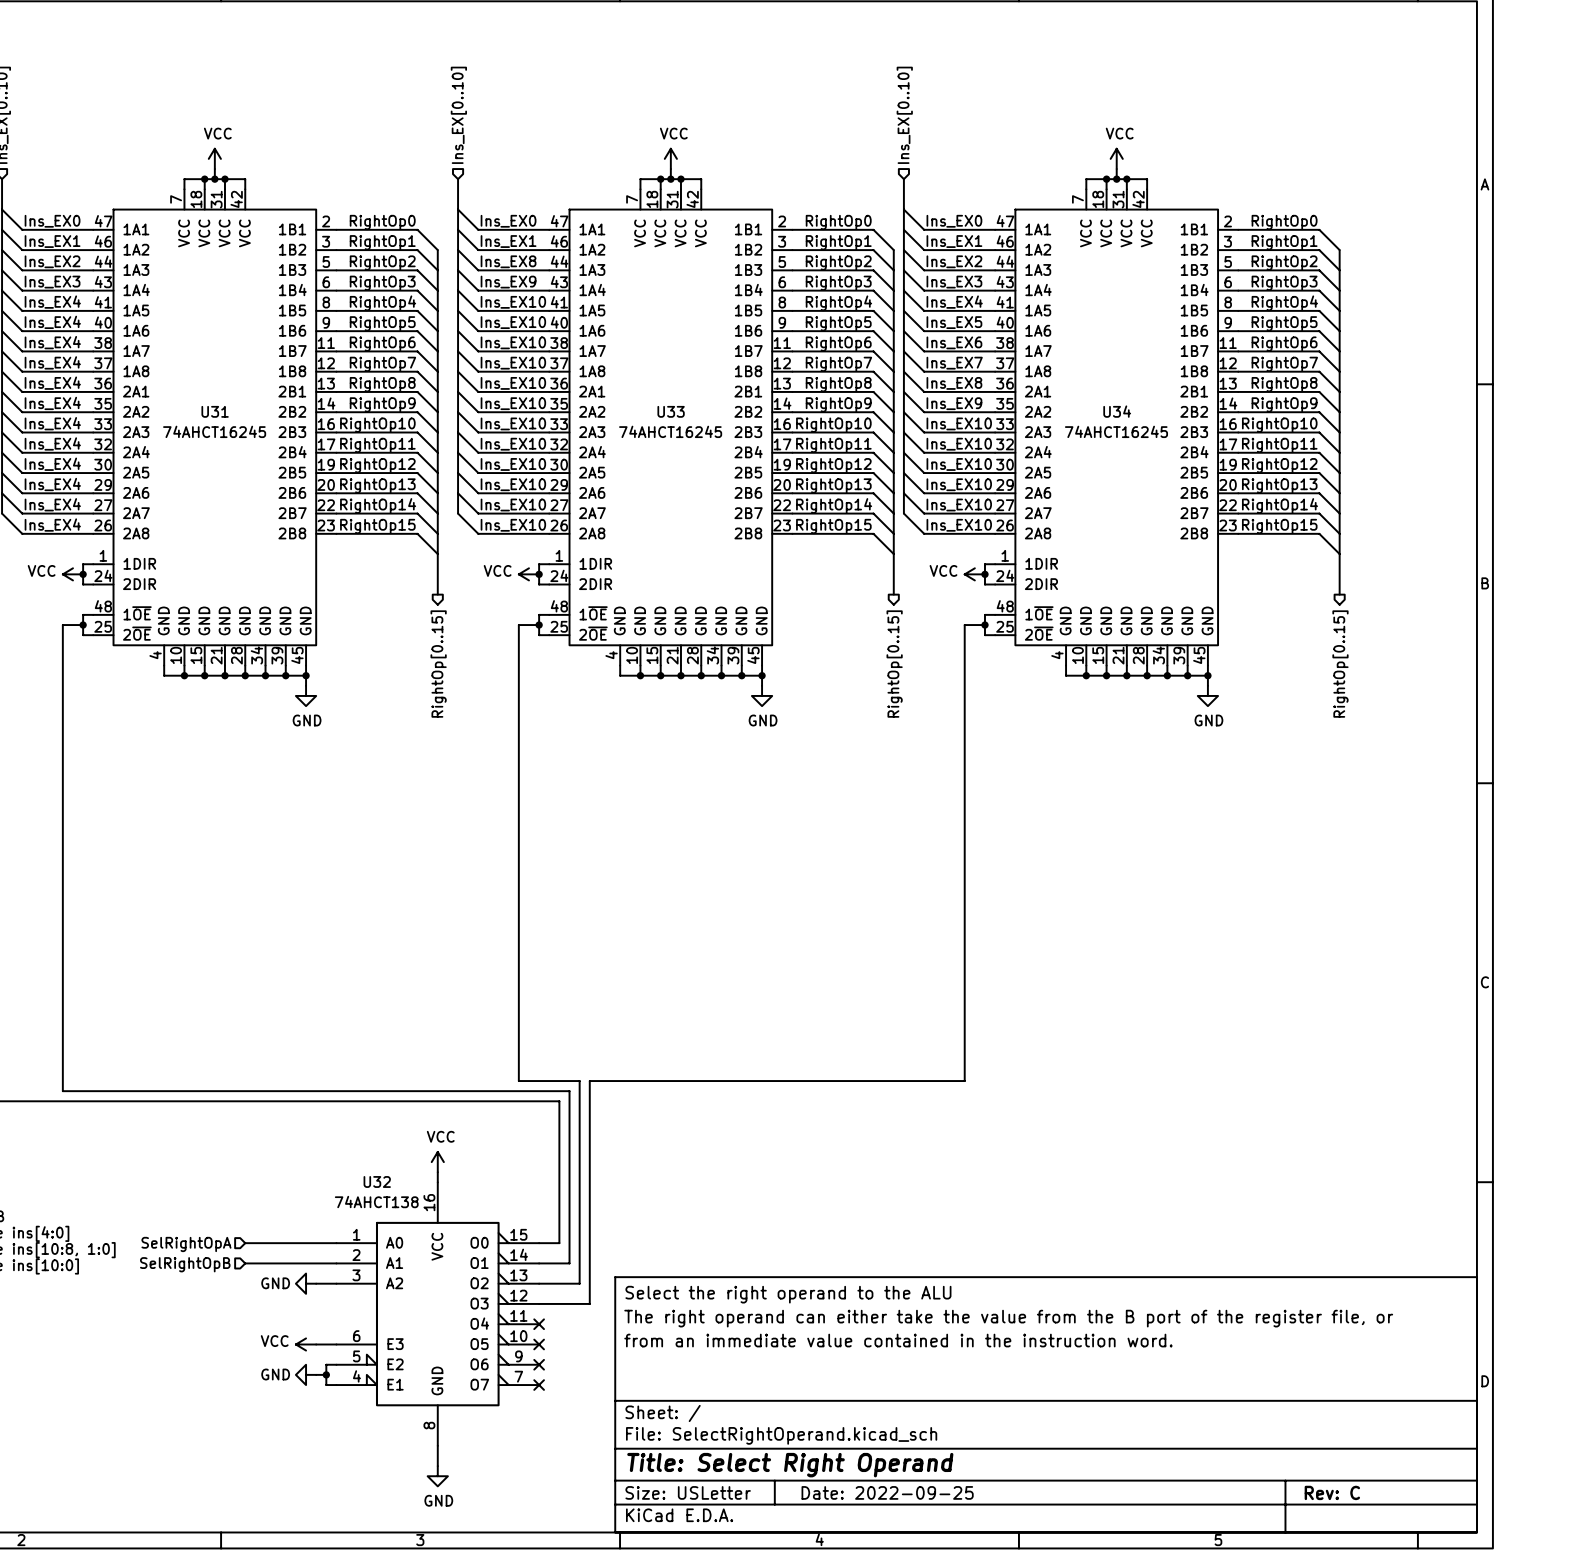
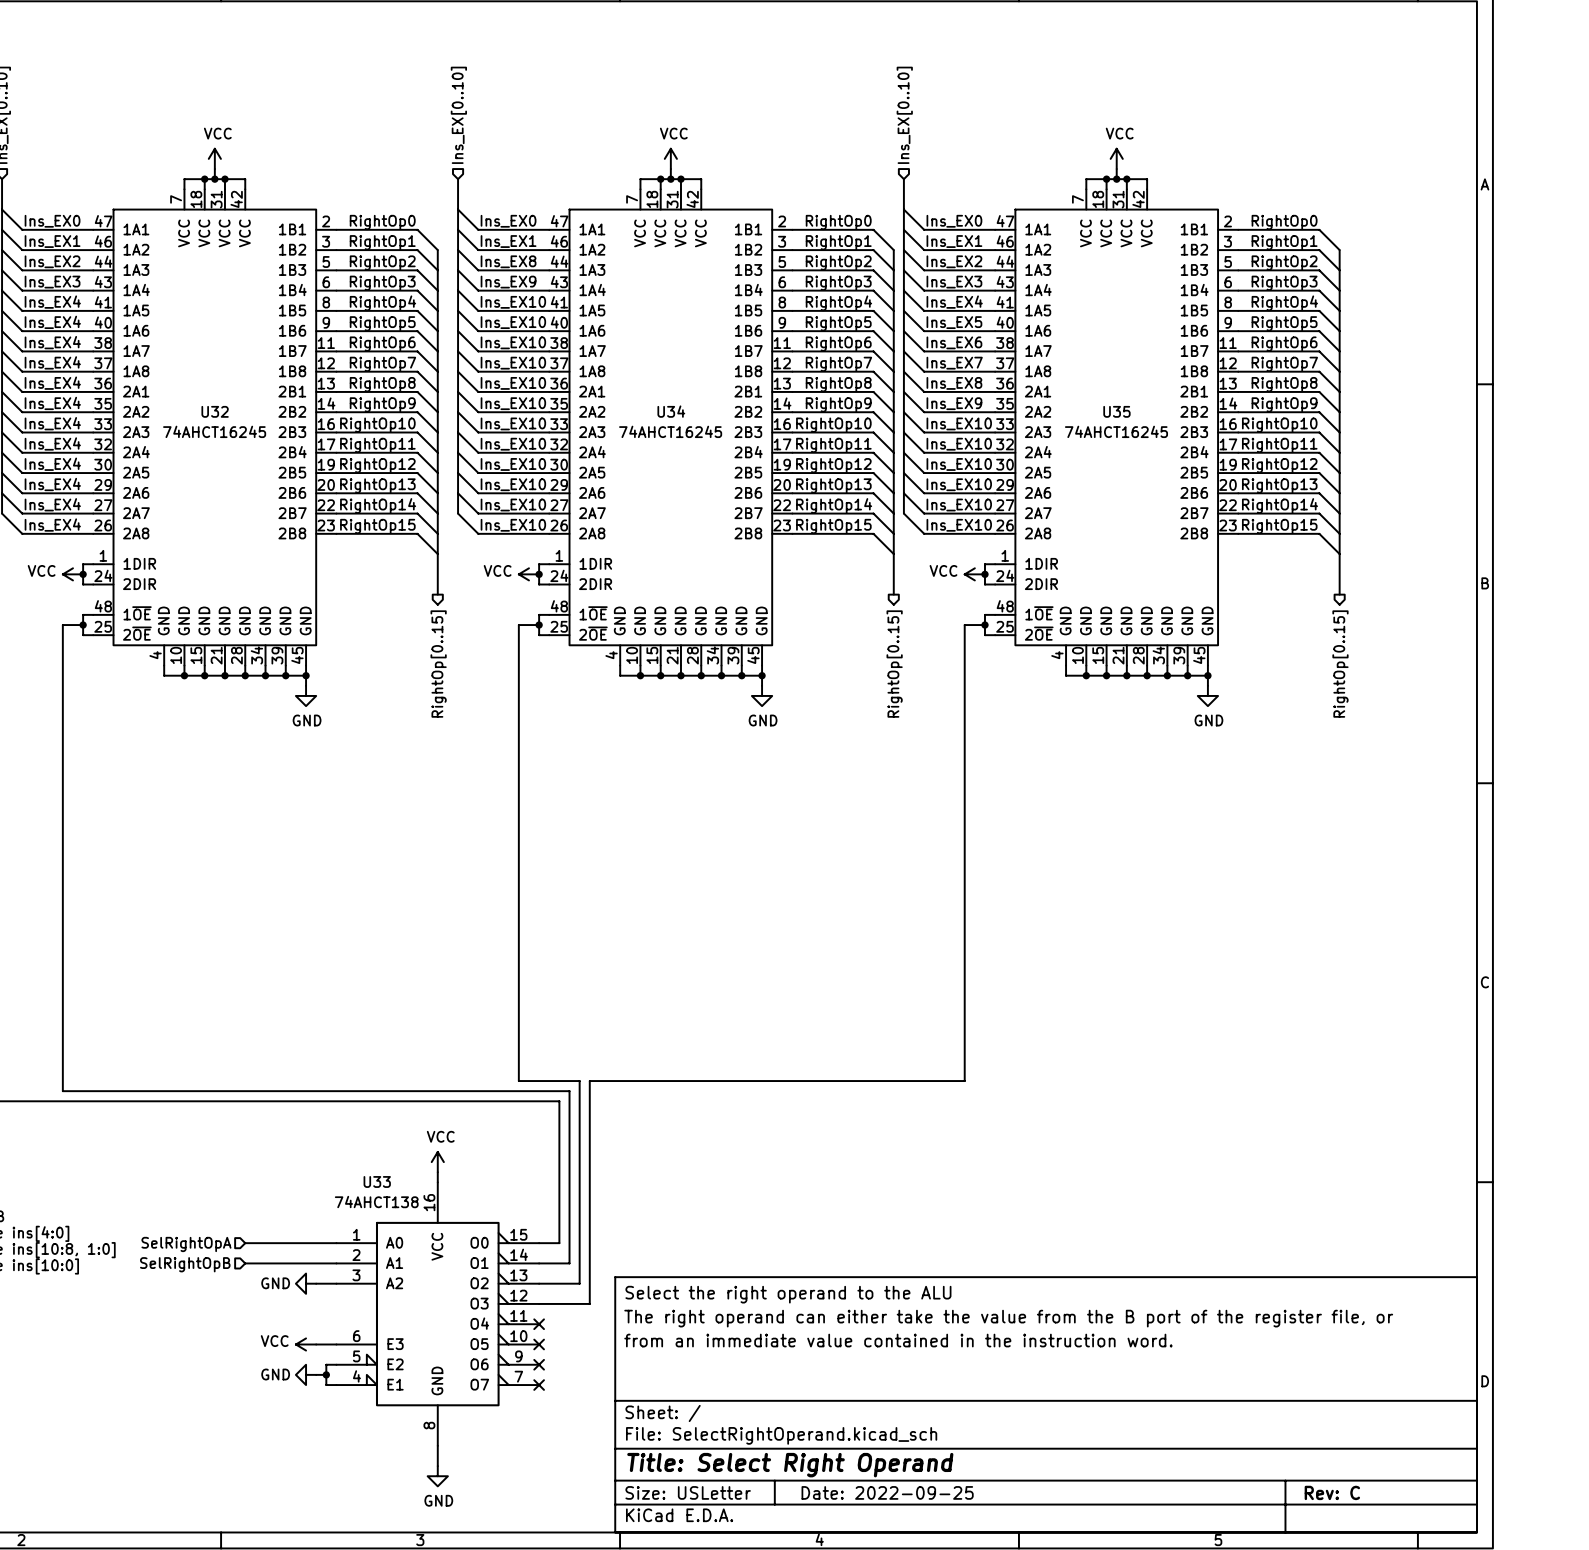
U31 name: U31 (215, 411) -> U32 (215, 411)
U33 name: U33 (671, 411) -> U34 (671, 411)
U34 name: U34 (1117, 411) -> U35 (1116, 411)
U32 name: U32 (377, 1181) -> U33 (377, 1181)

